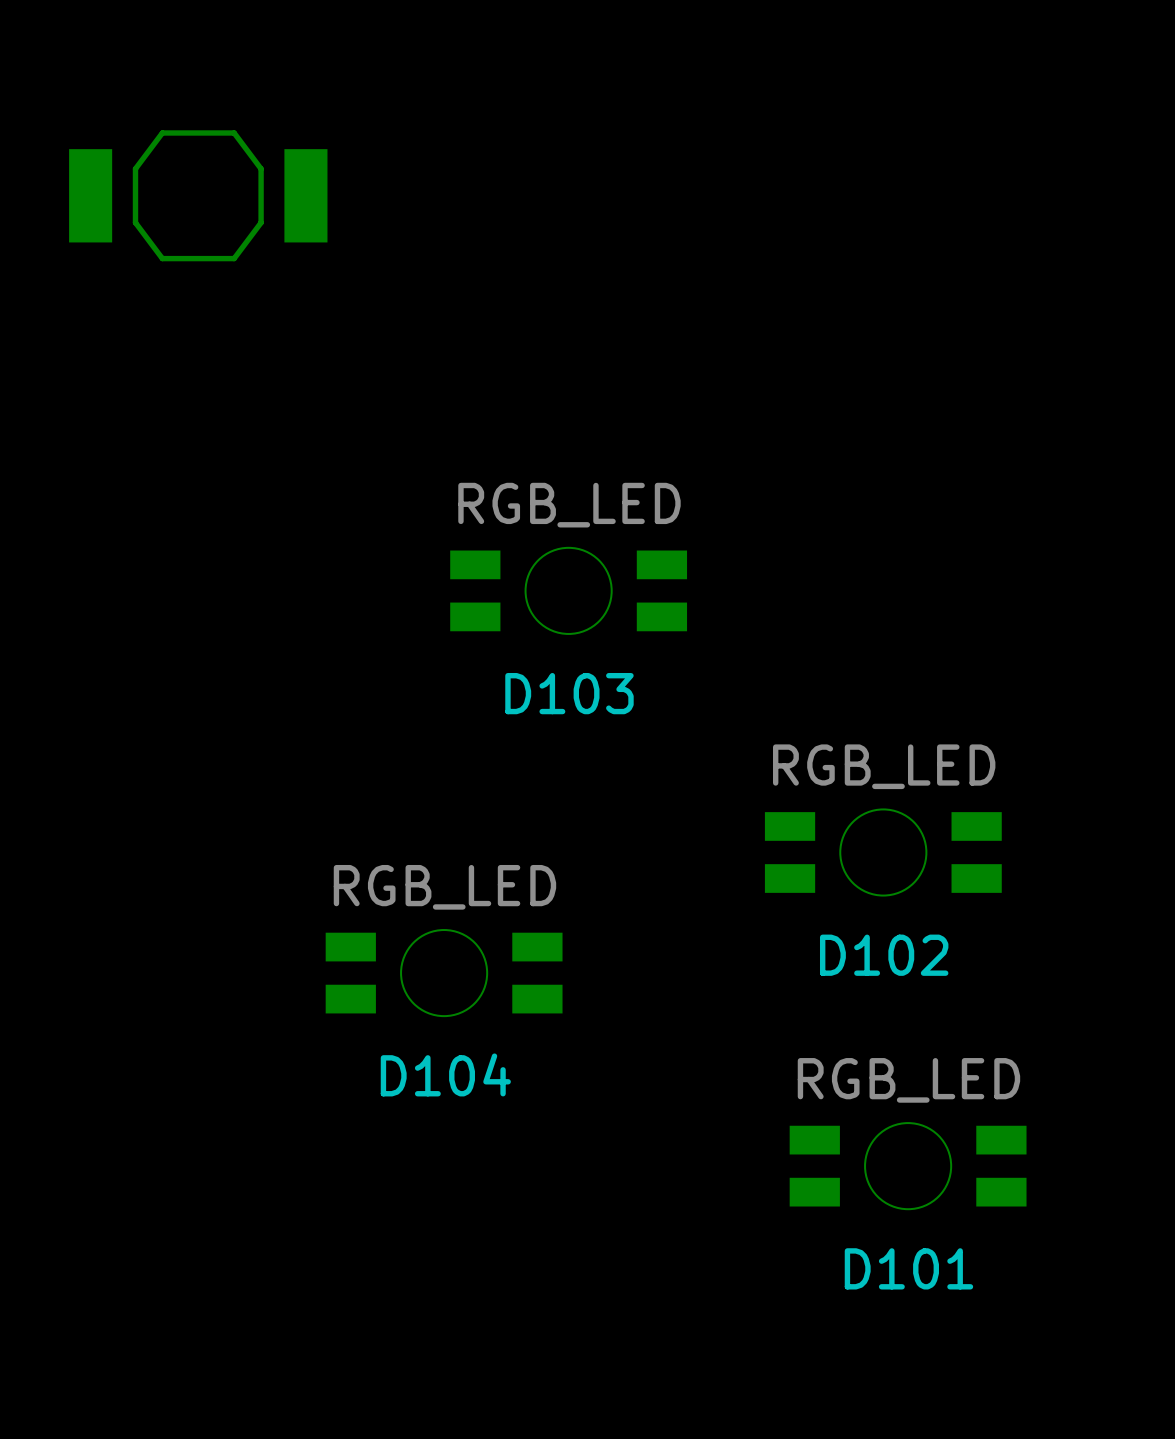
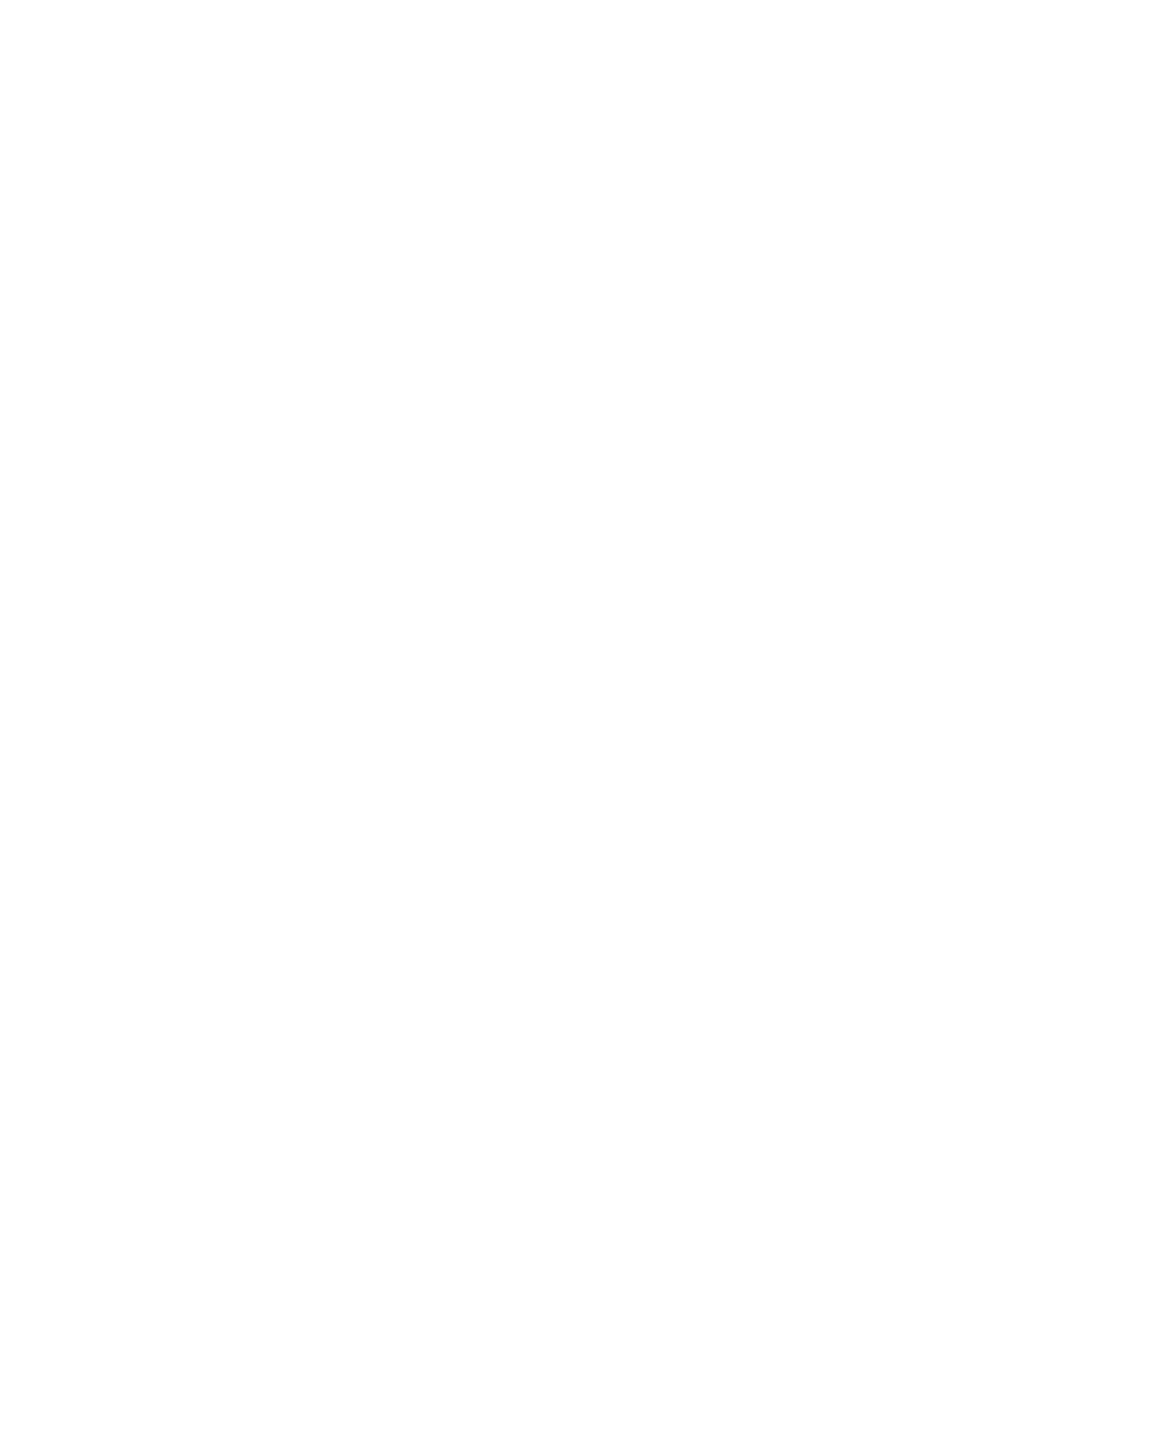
part: (198, 195) -> none
D103: RGB_LED (568, 590) -> none
D102: RGB_LED (883, 852) -> none
D104: RGB_LED (444, 973) -> none
D101: RGB_LED (908, 1166) -> none

